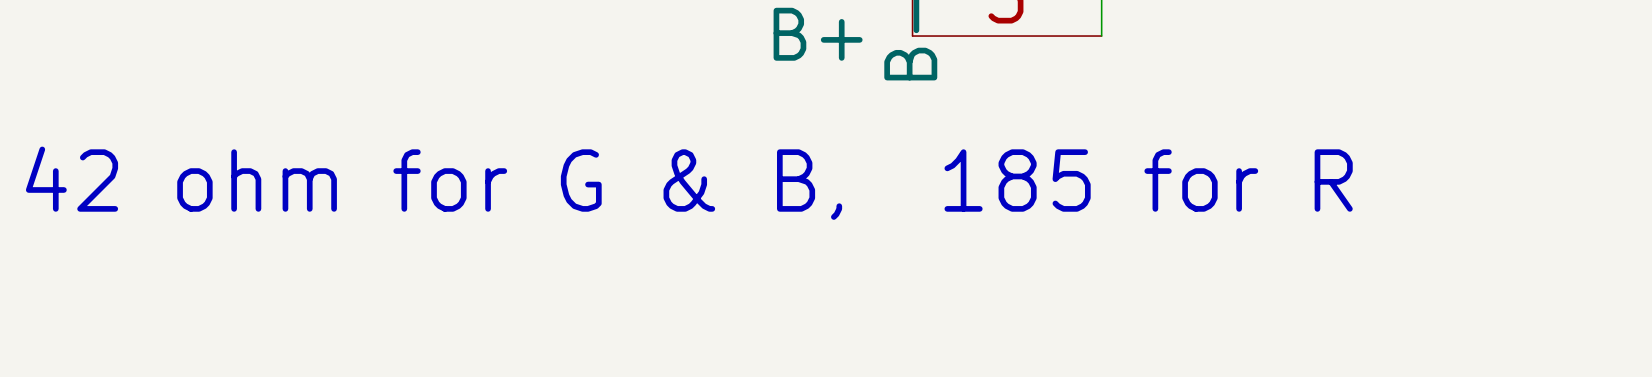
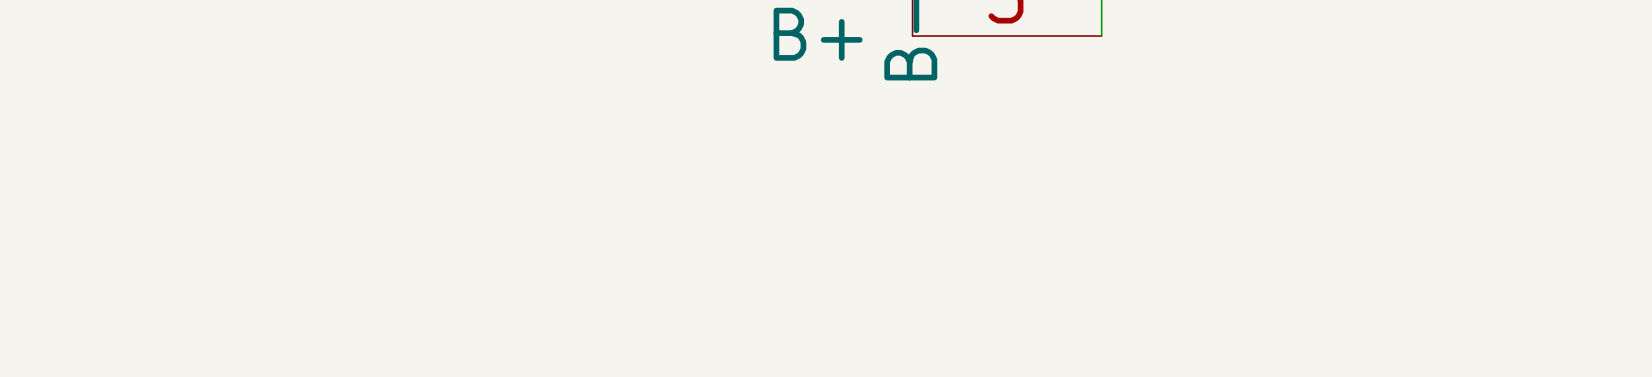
text: 42 ohm for G & B, 185 for R (689, 183) -> none

